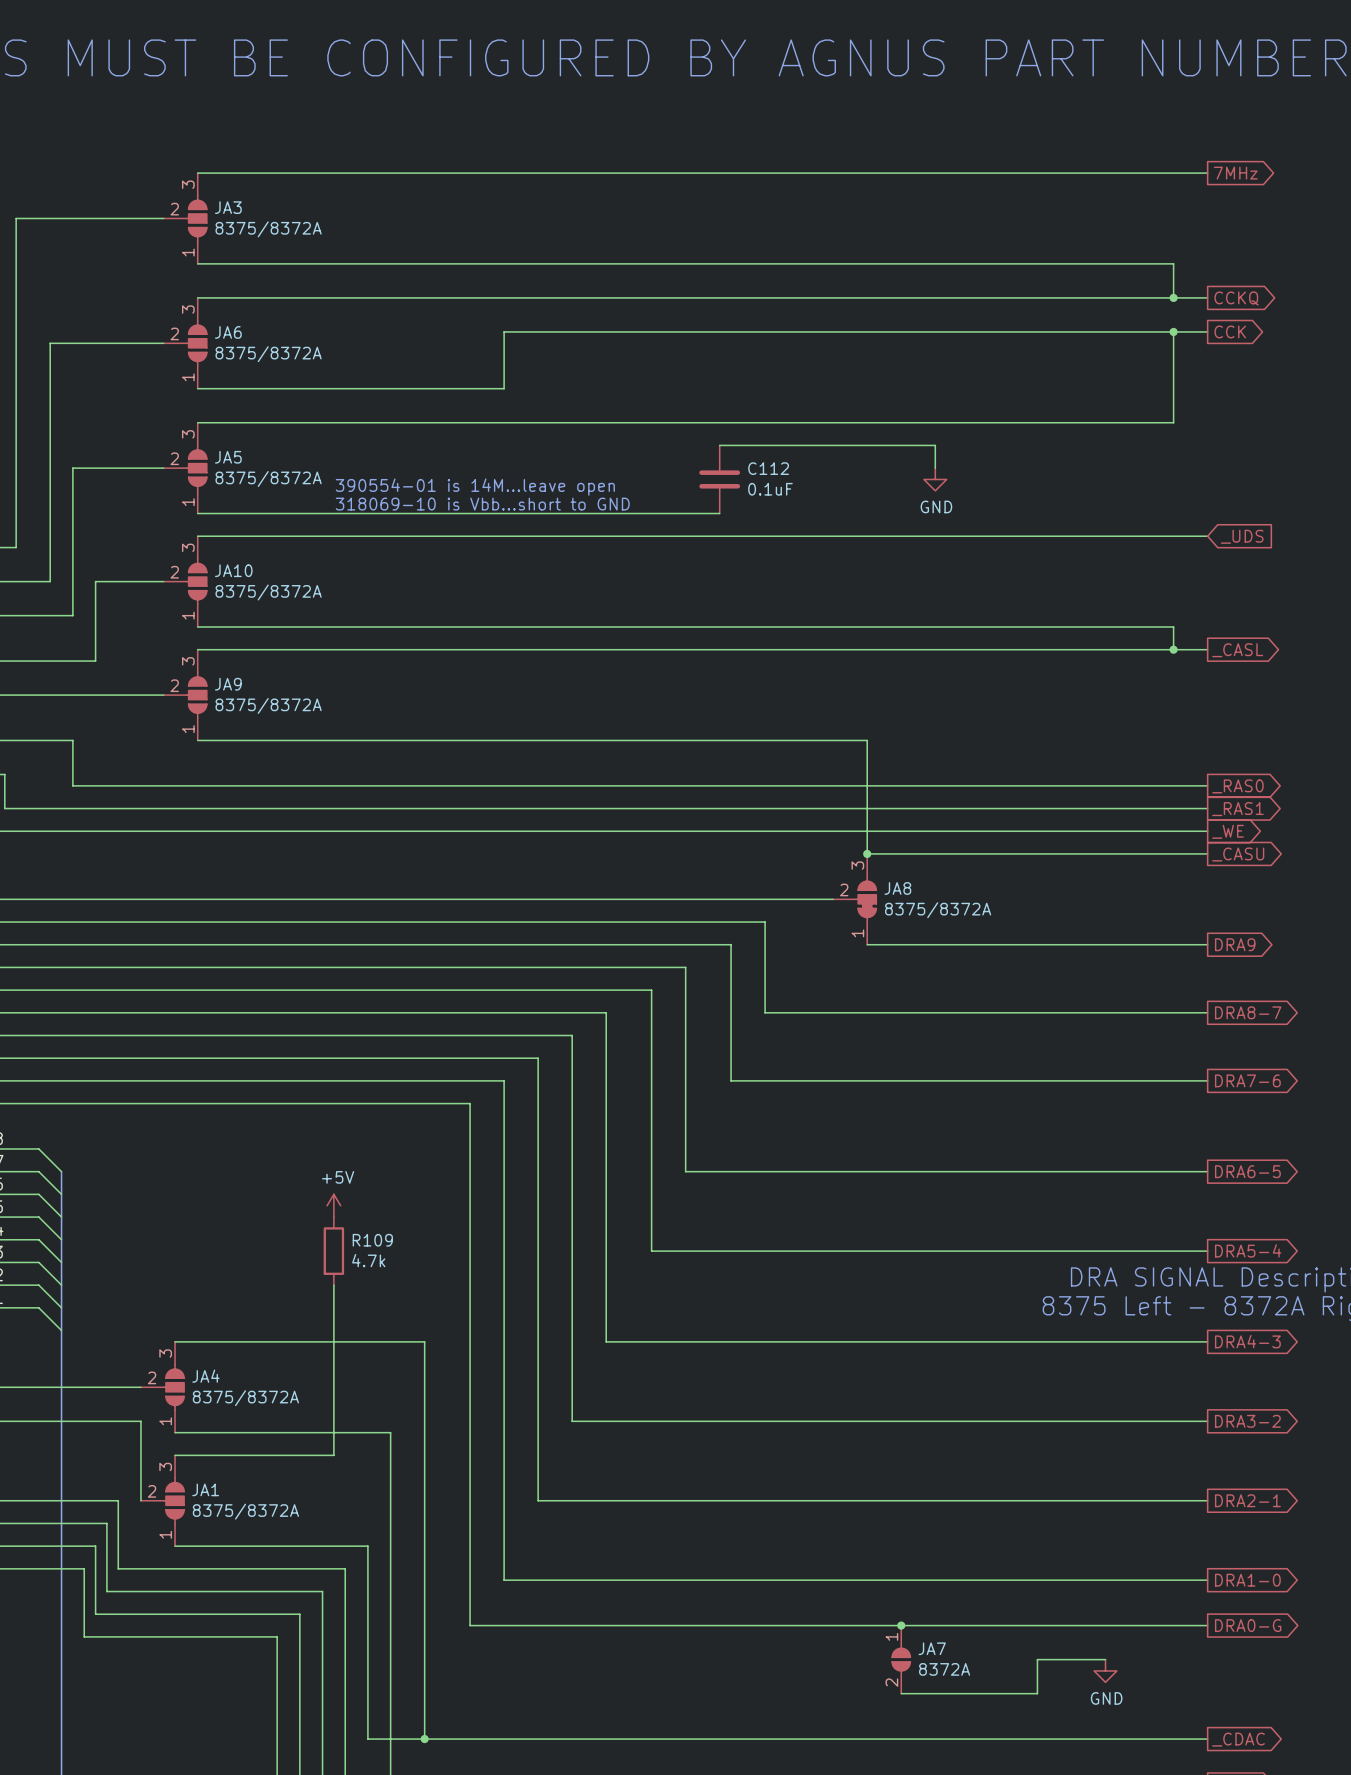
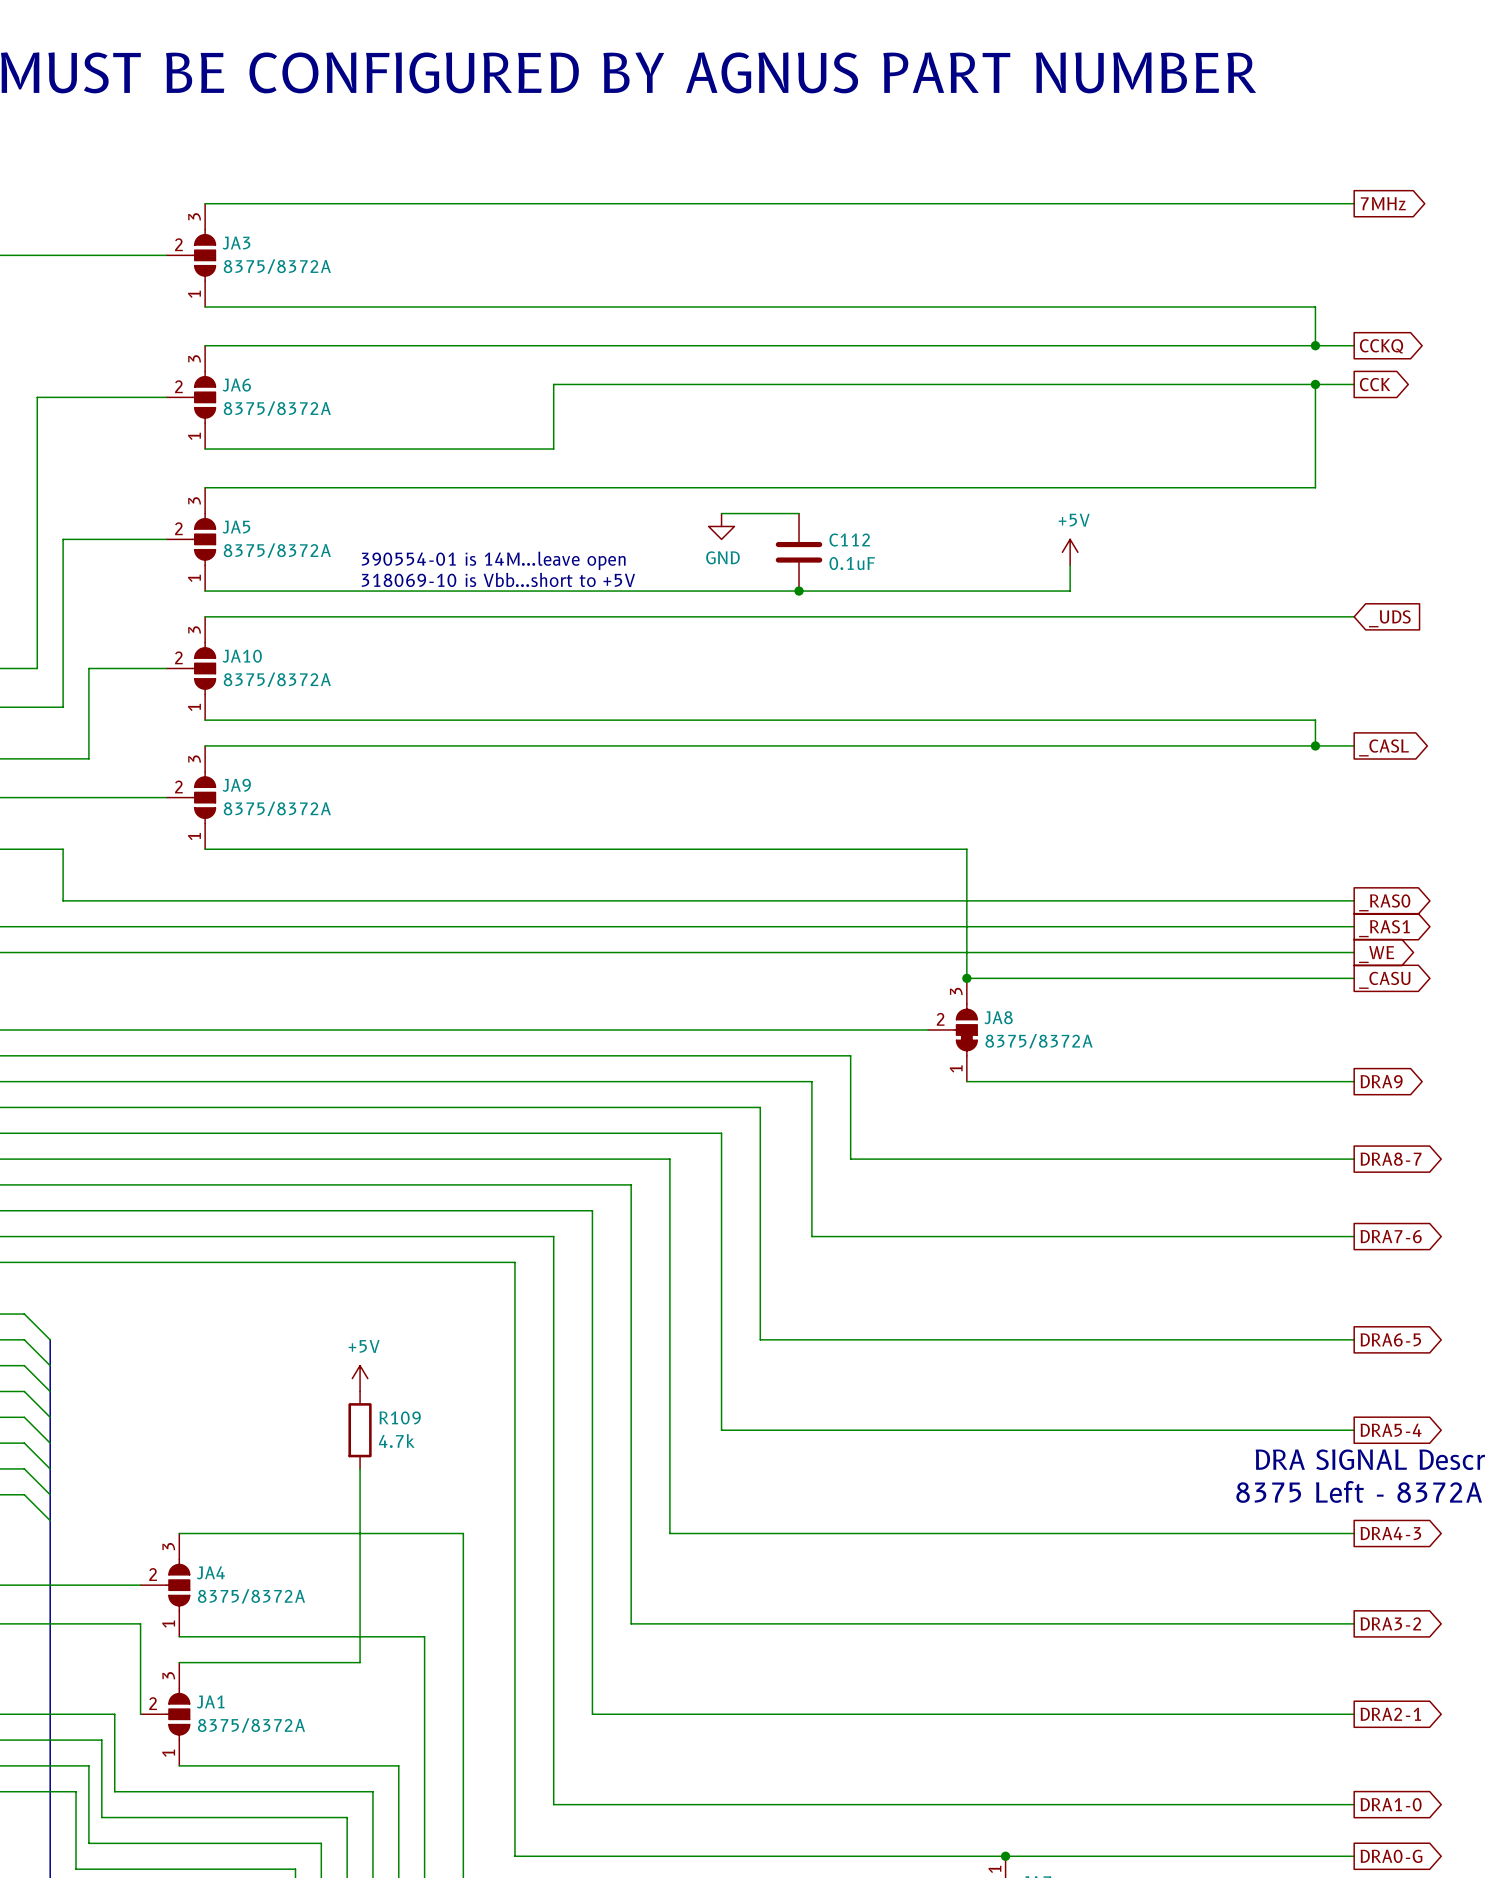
wire: (719, 445) (935, 445) (935, 468) -> (799, 513) (721, 513)
power symbol: none -> GND (721, 526)
power symbol: GND (935, 479) -> none
power symbol: none -> +5V (1070, 552)
wire: none -> (1070, 565) (1070, 591) (799, 591)
text: 318069-10 is Vbb...short to GND (482, 504) -> 318069-10 is Vbb...short to +5V (498, 579)
junction: none -> (799, 591)

